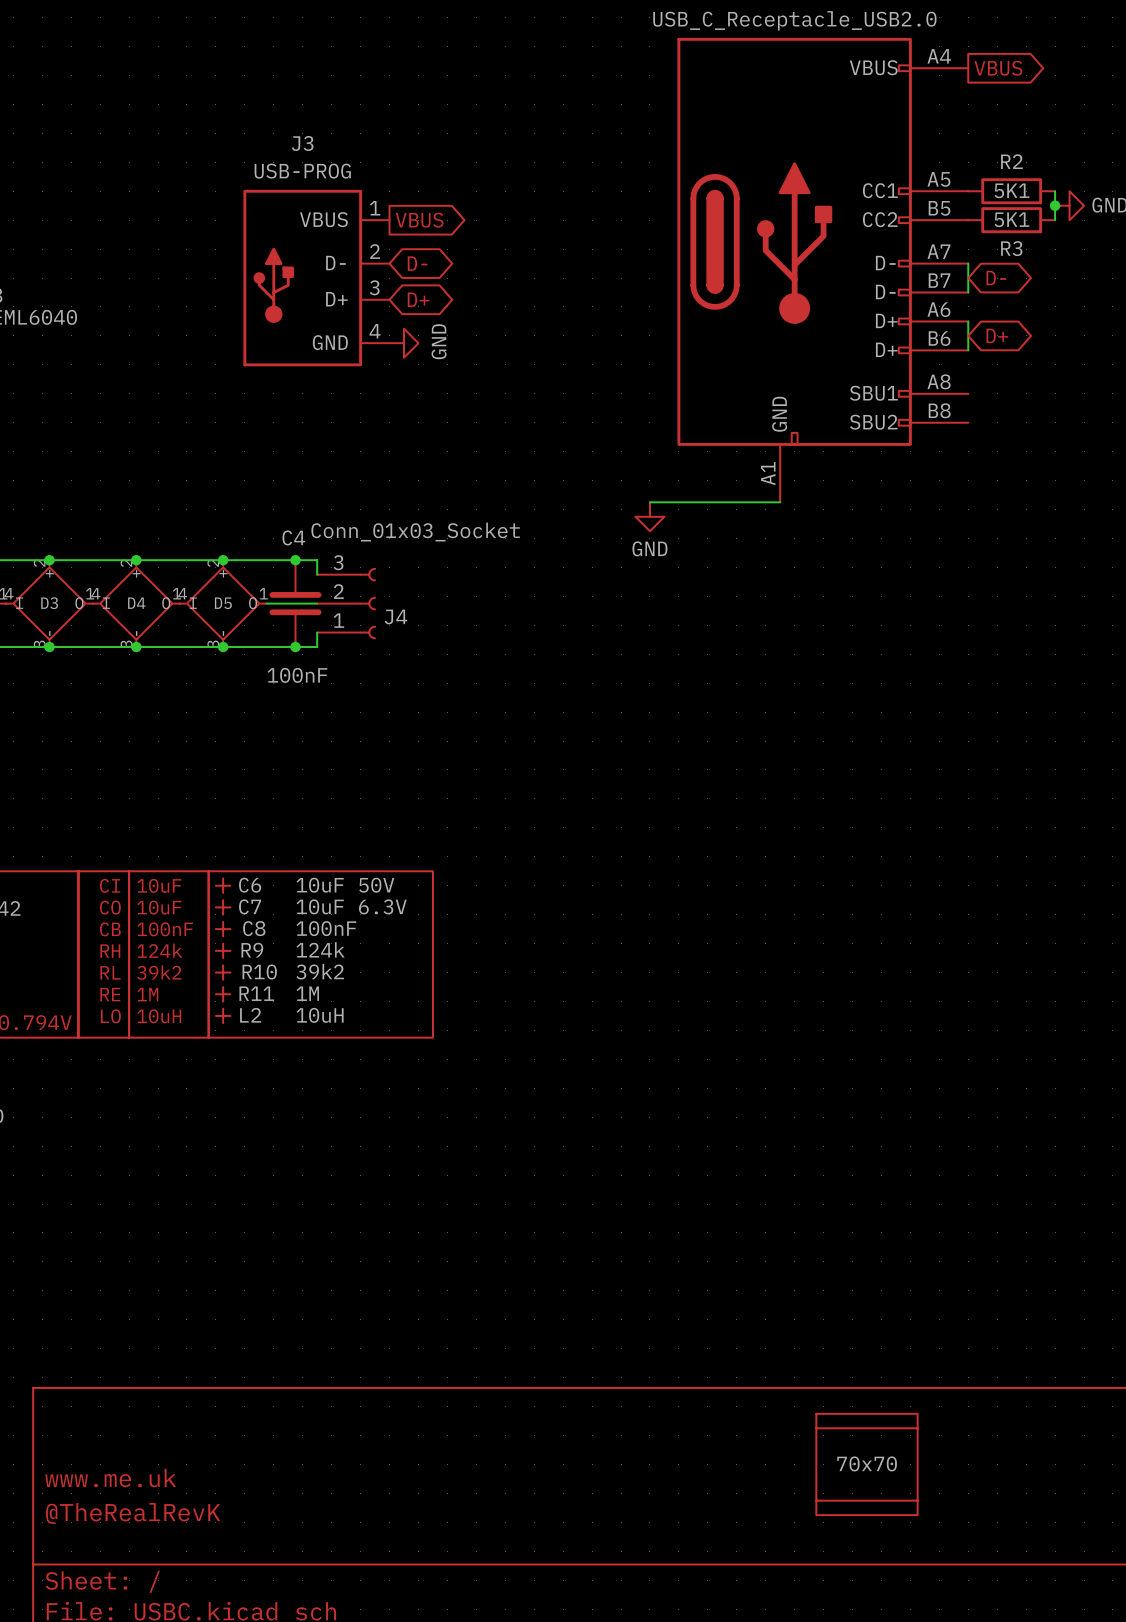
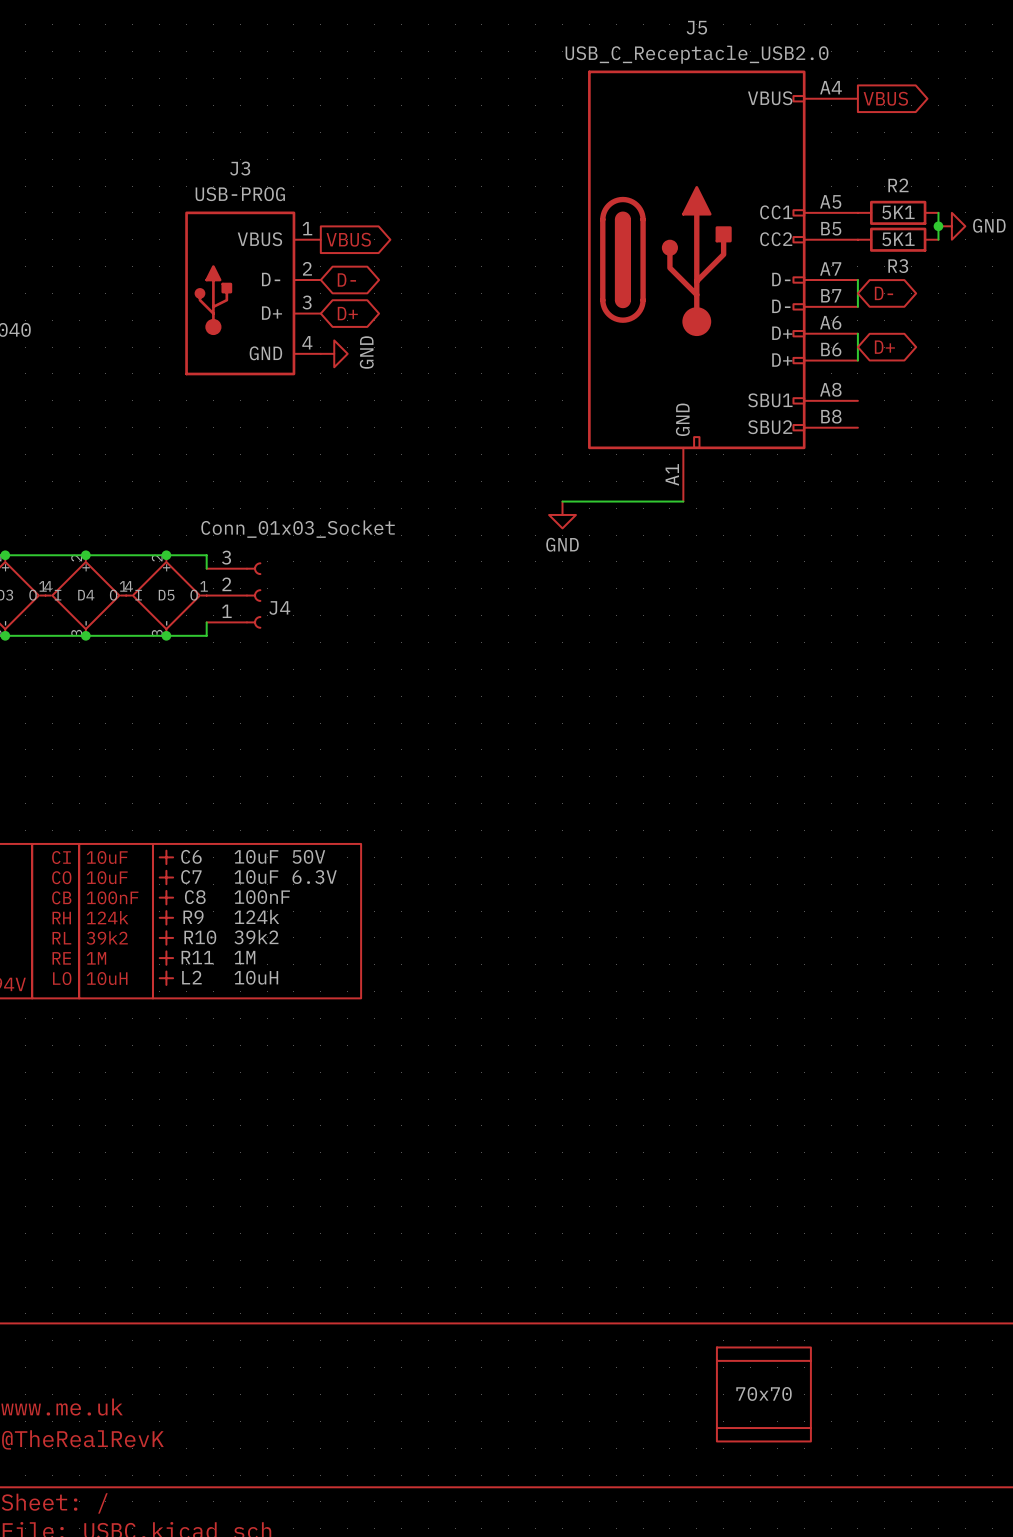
wire: (266, 560) (317, 560) (317, 574) -> (206, 555) (206, 568)
junction: (295, 560) -> none
C4: 100nF (295, 603) -> none
J4 position: (346, 603) -> (233, 595)
wire: (317, 632) (317, 647) (266, 647) -> (206, 622) (206, 635)
junction: (295, 647) -> none

